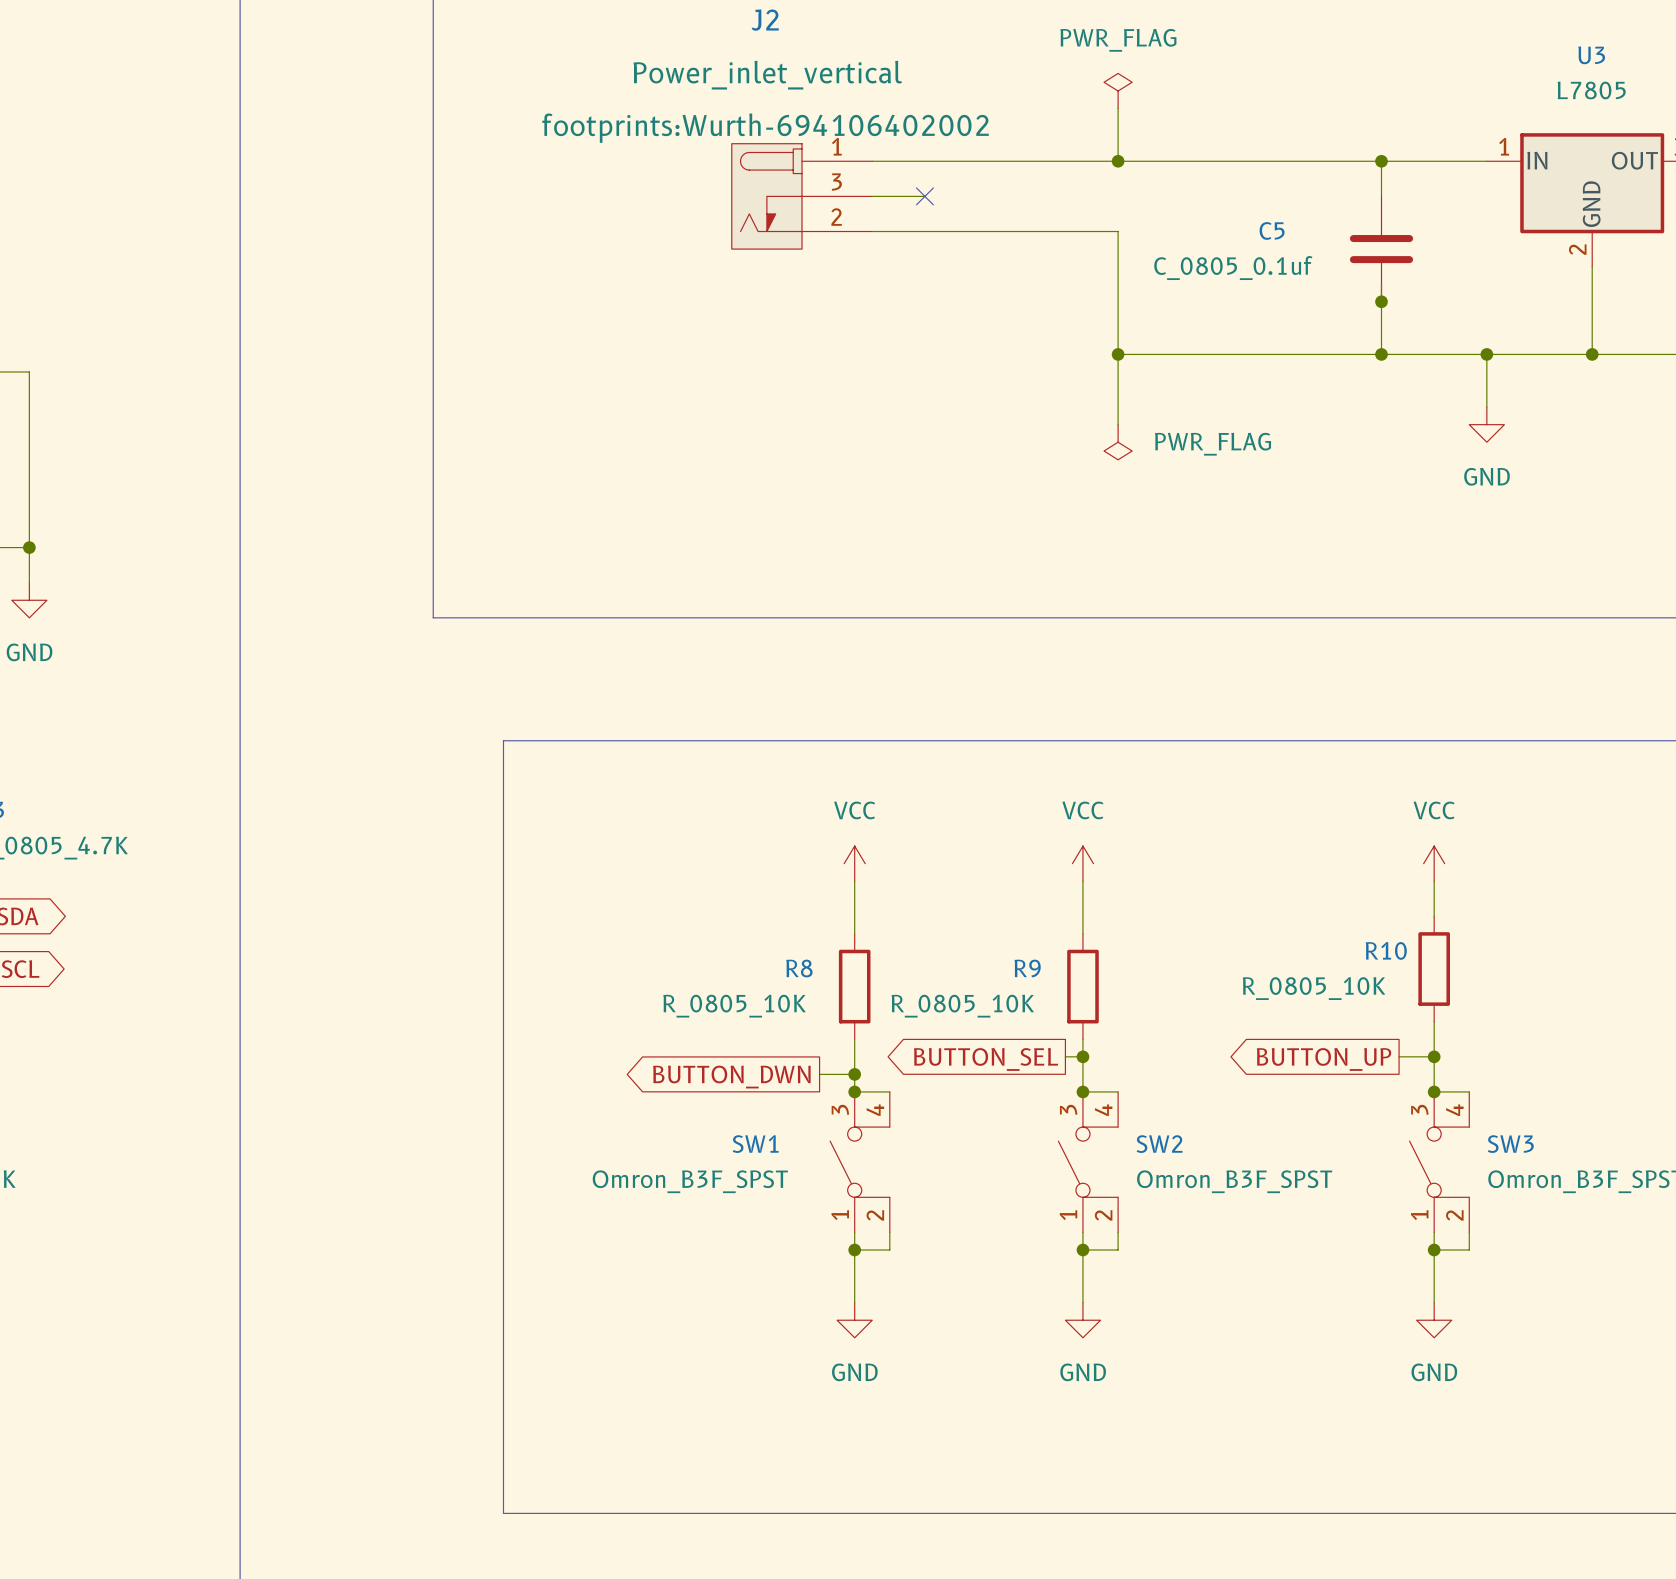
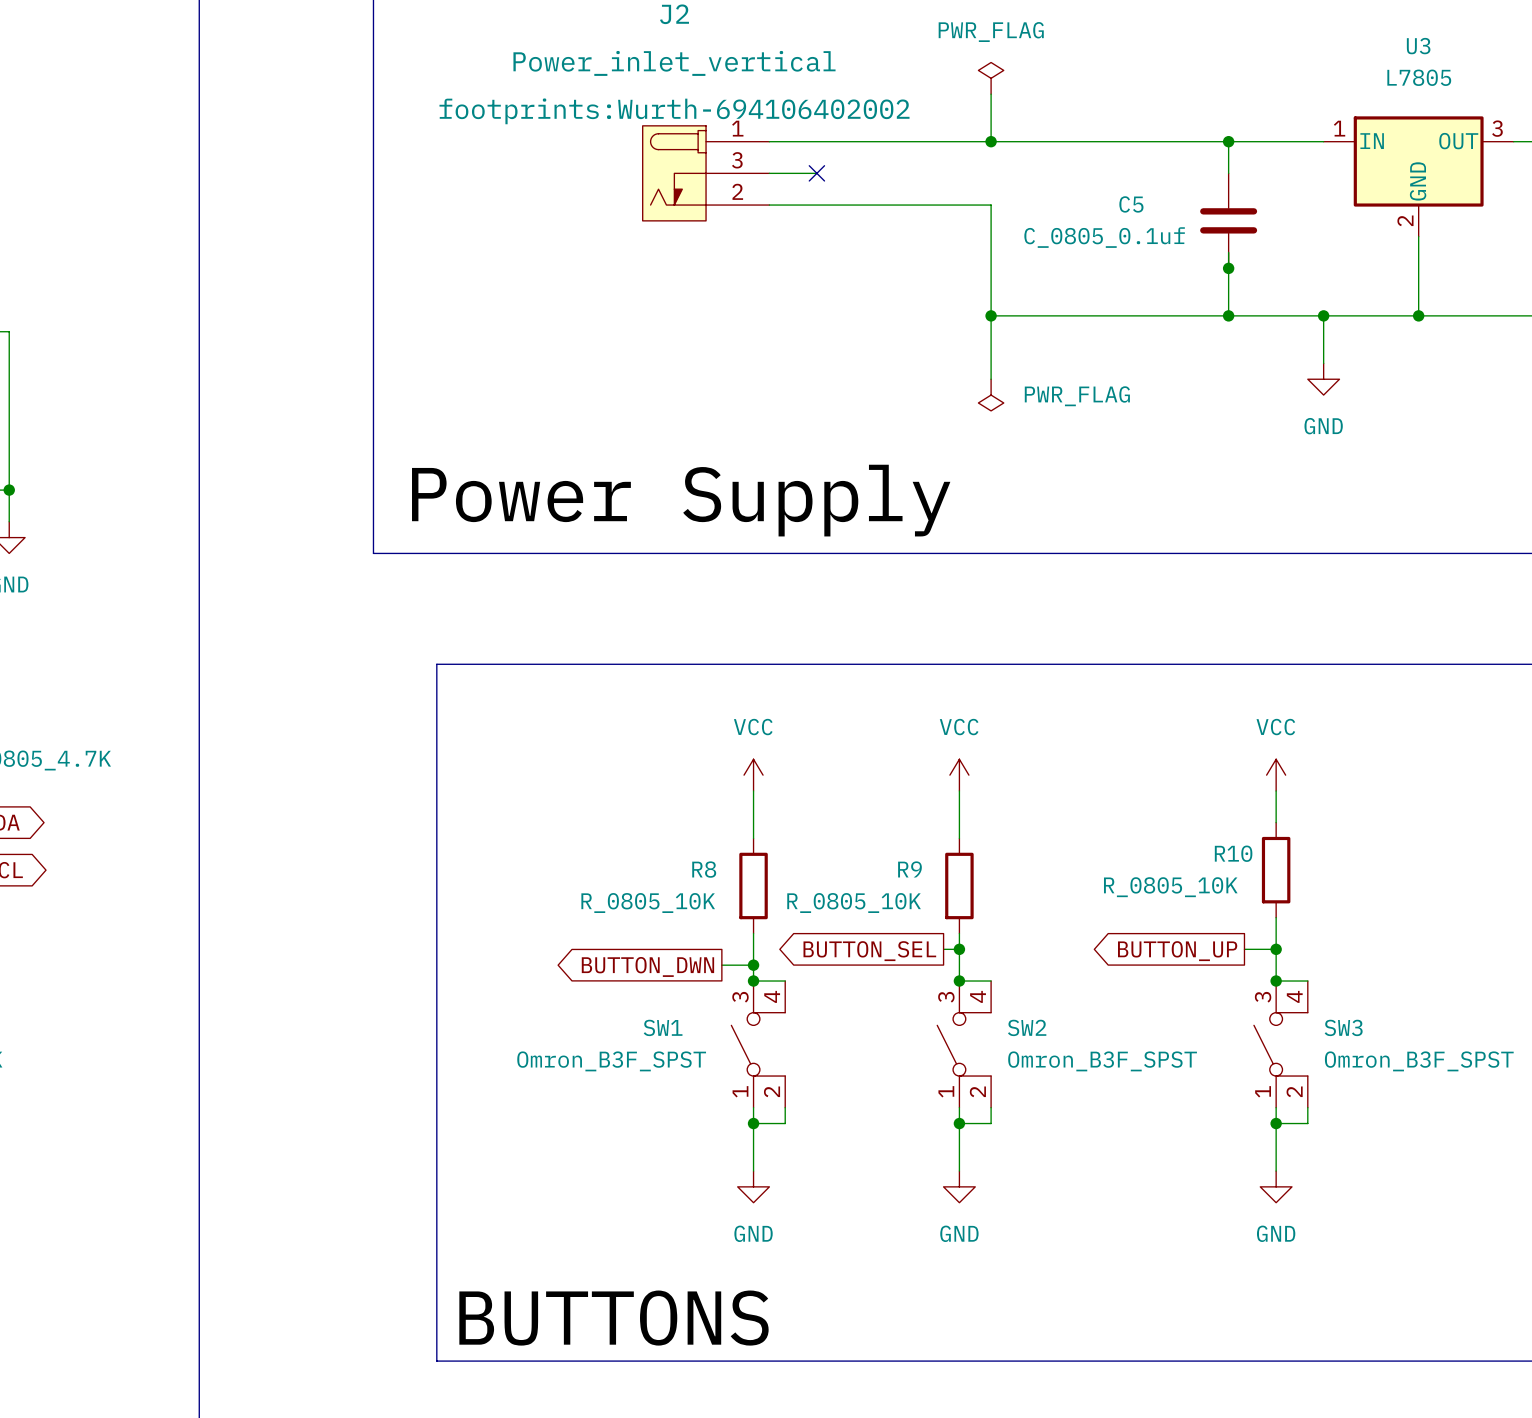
label: none -> Power Supply (681, 500)
label: none -> BUTTONS (614, 1318)

